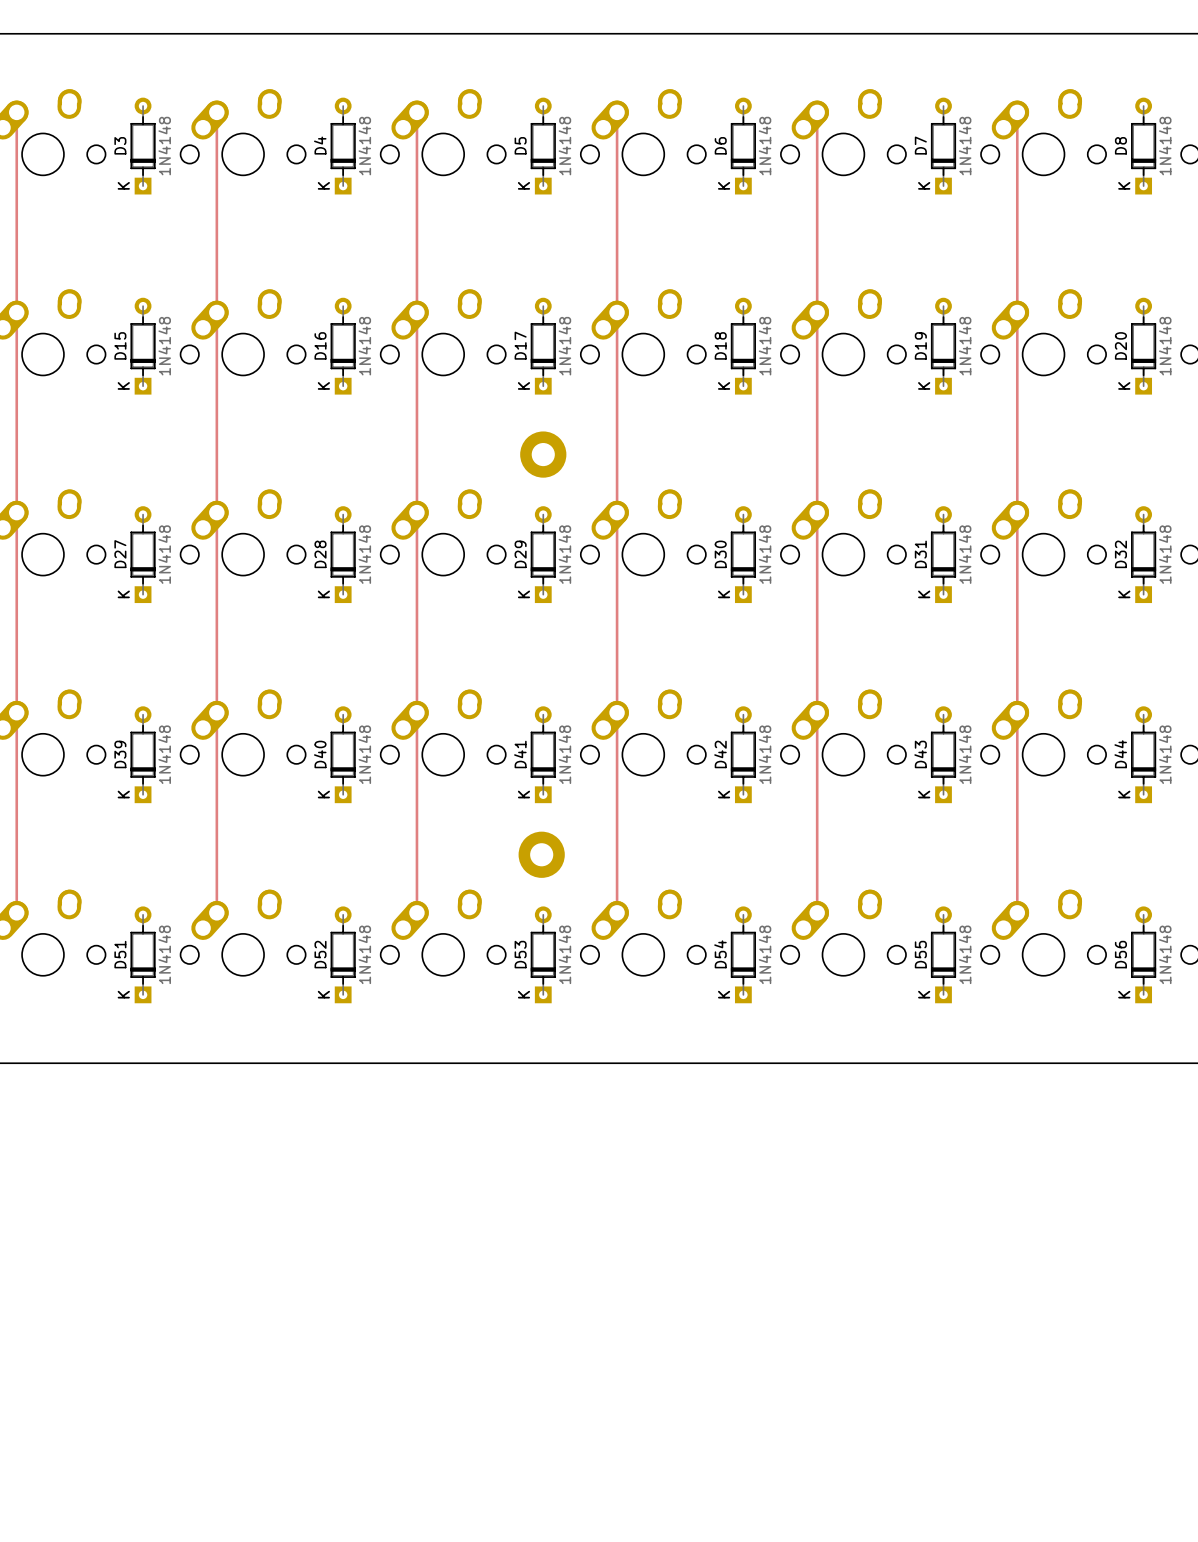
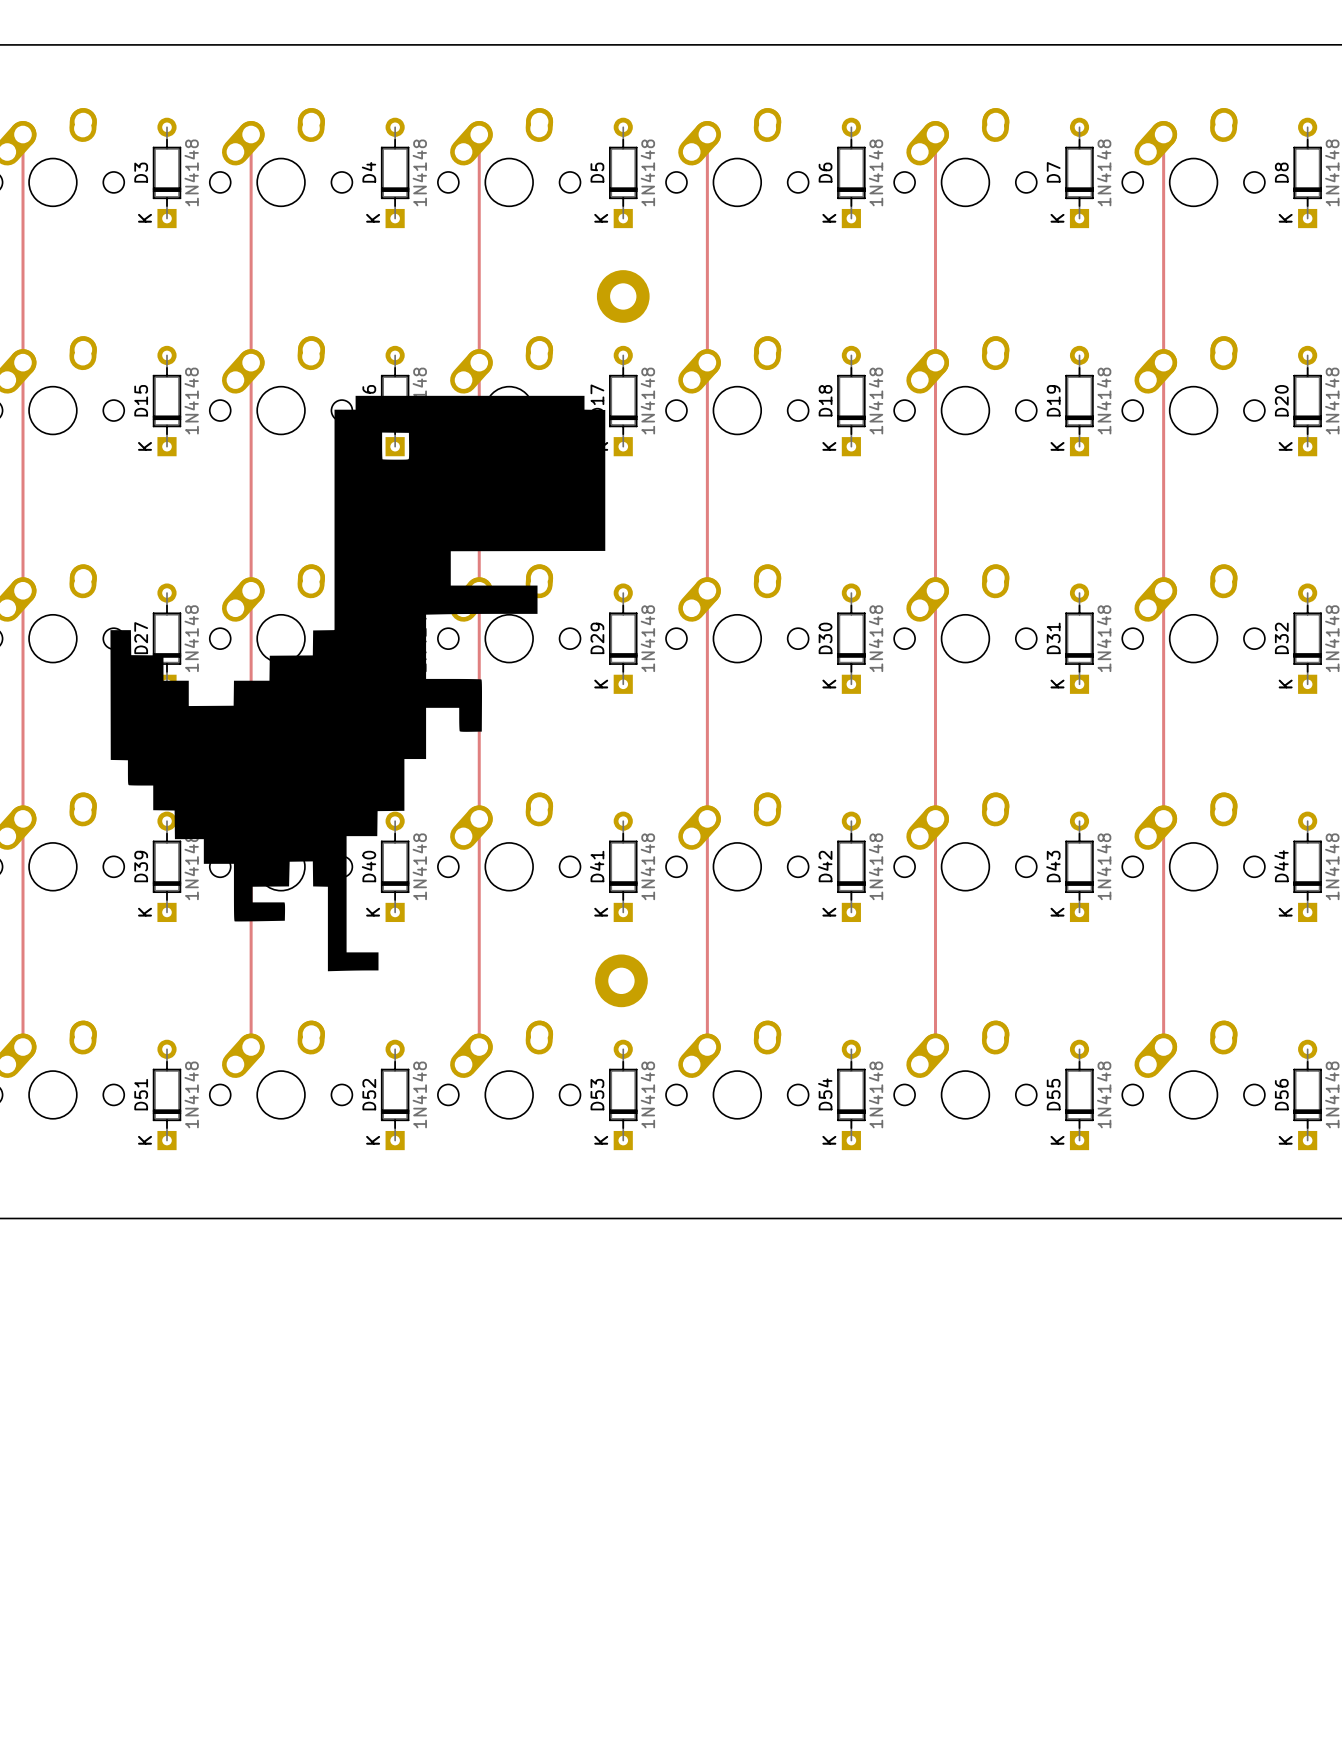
part position: (543, 454) -> (623, 296)
part: none -> (357, 683)

